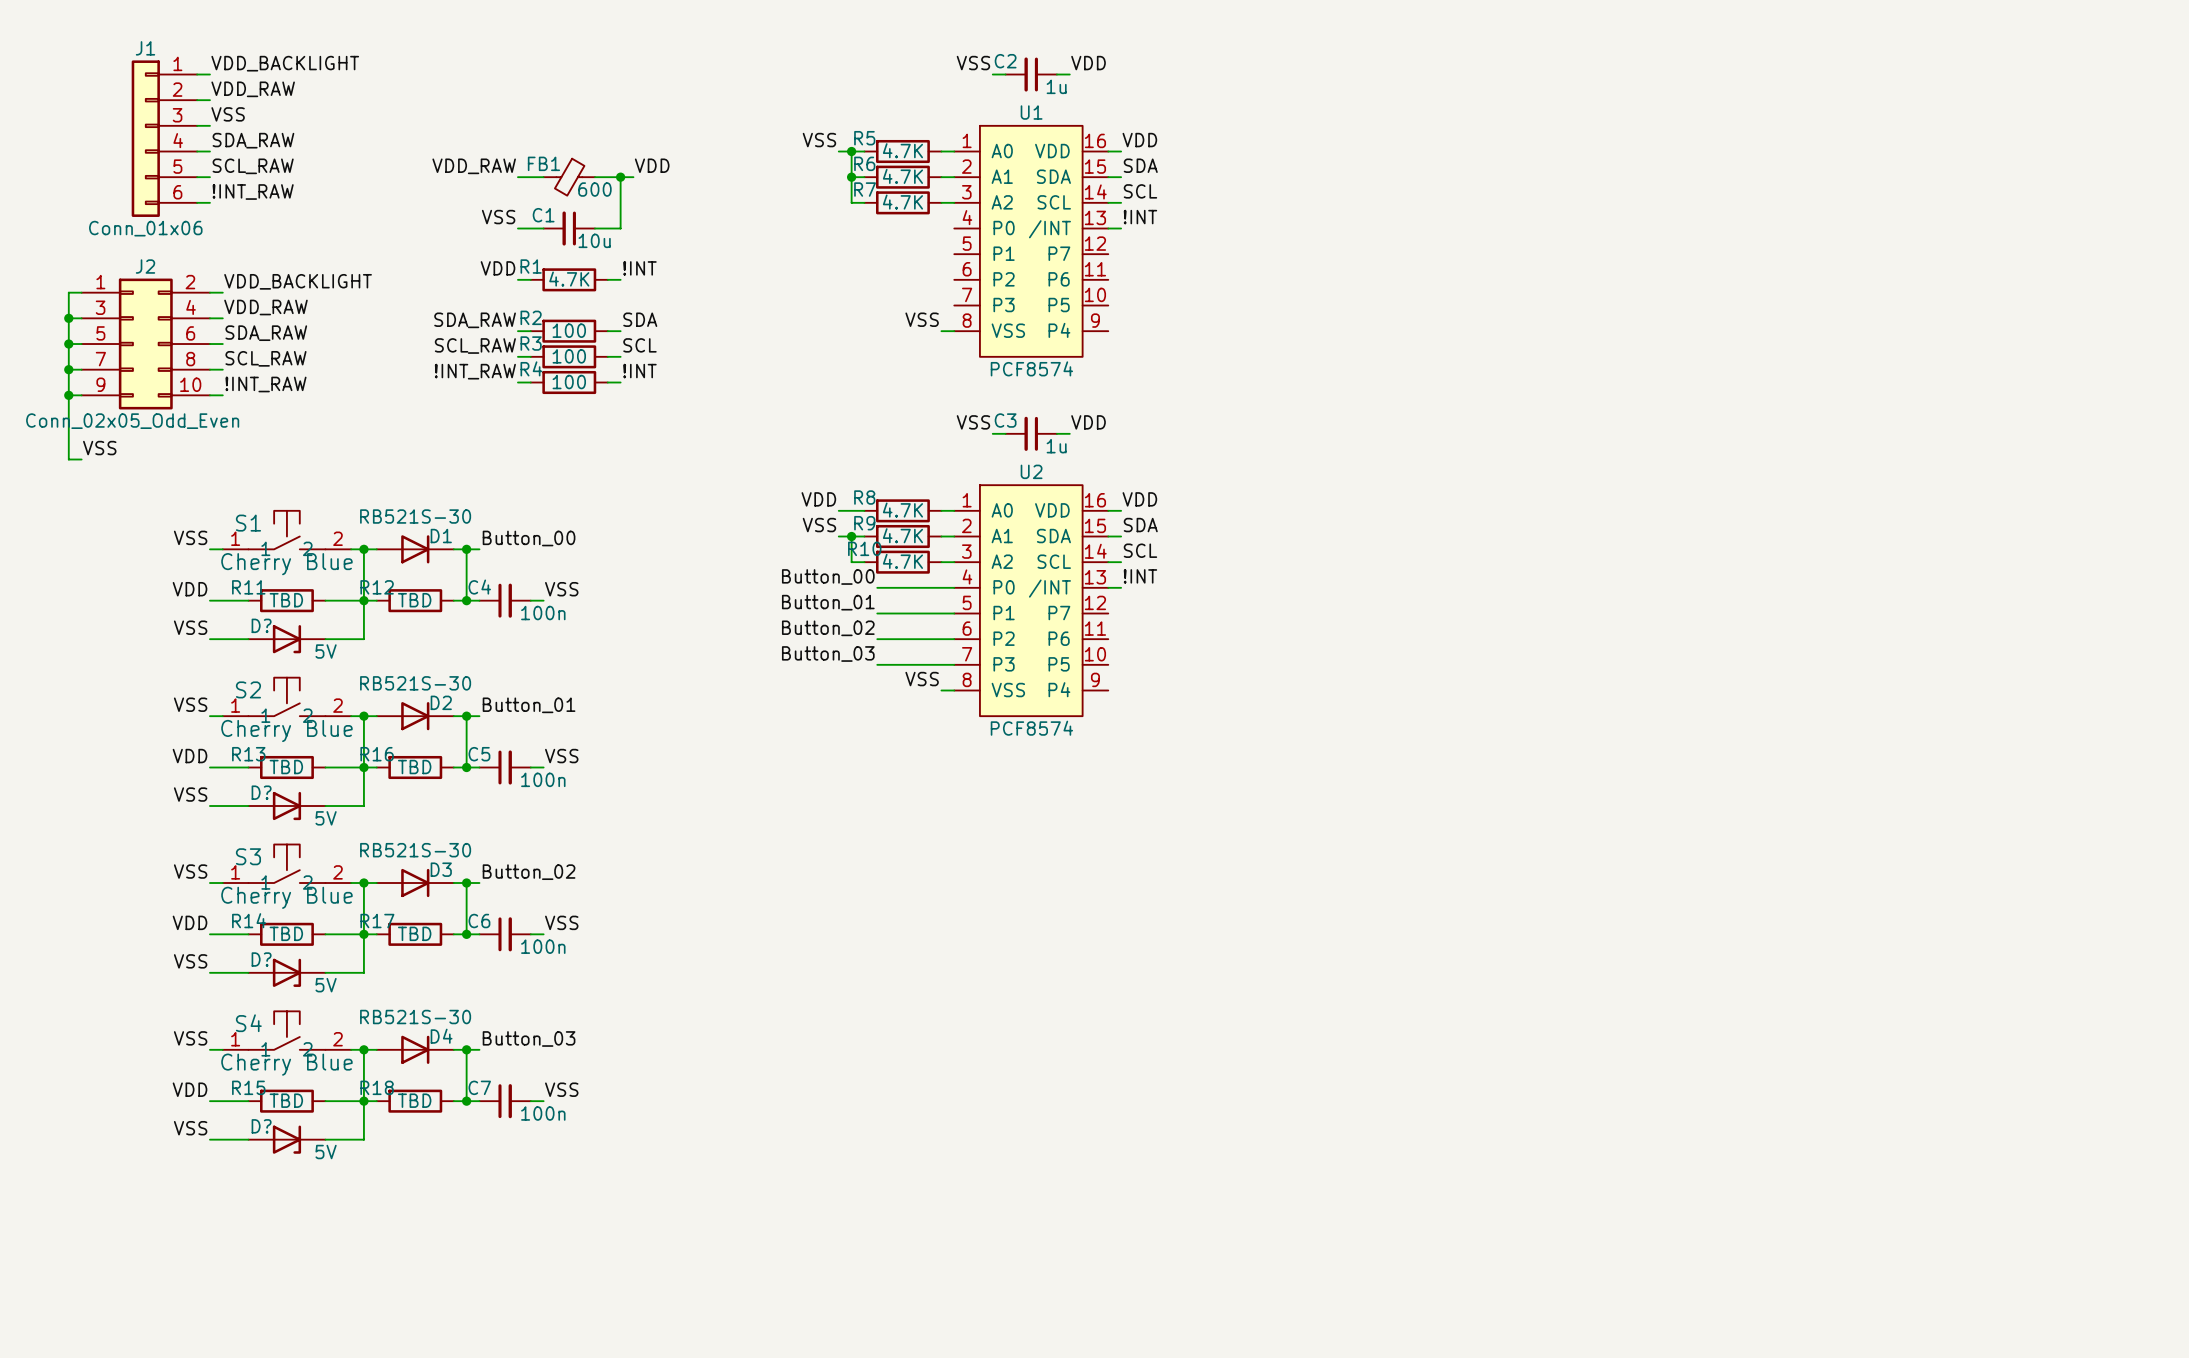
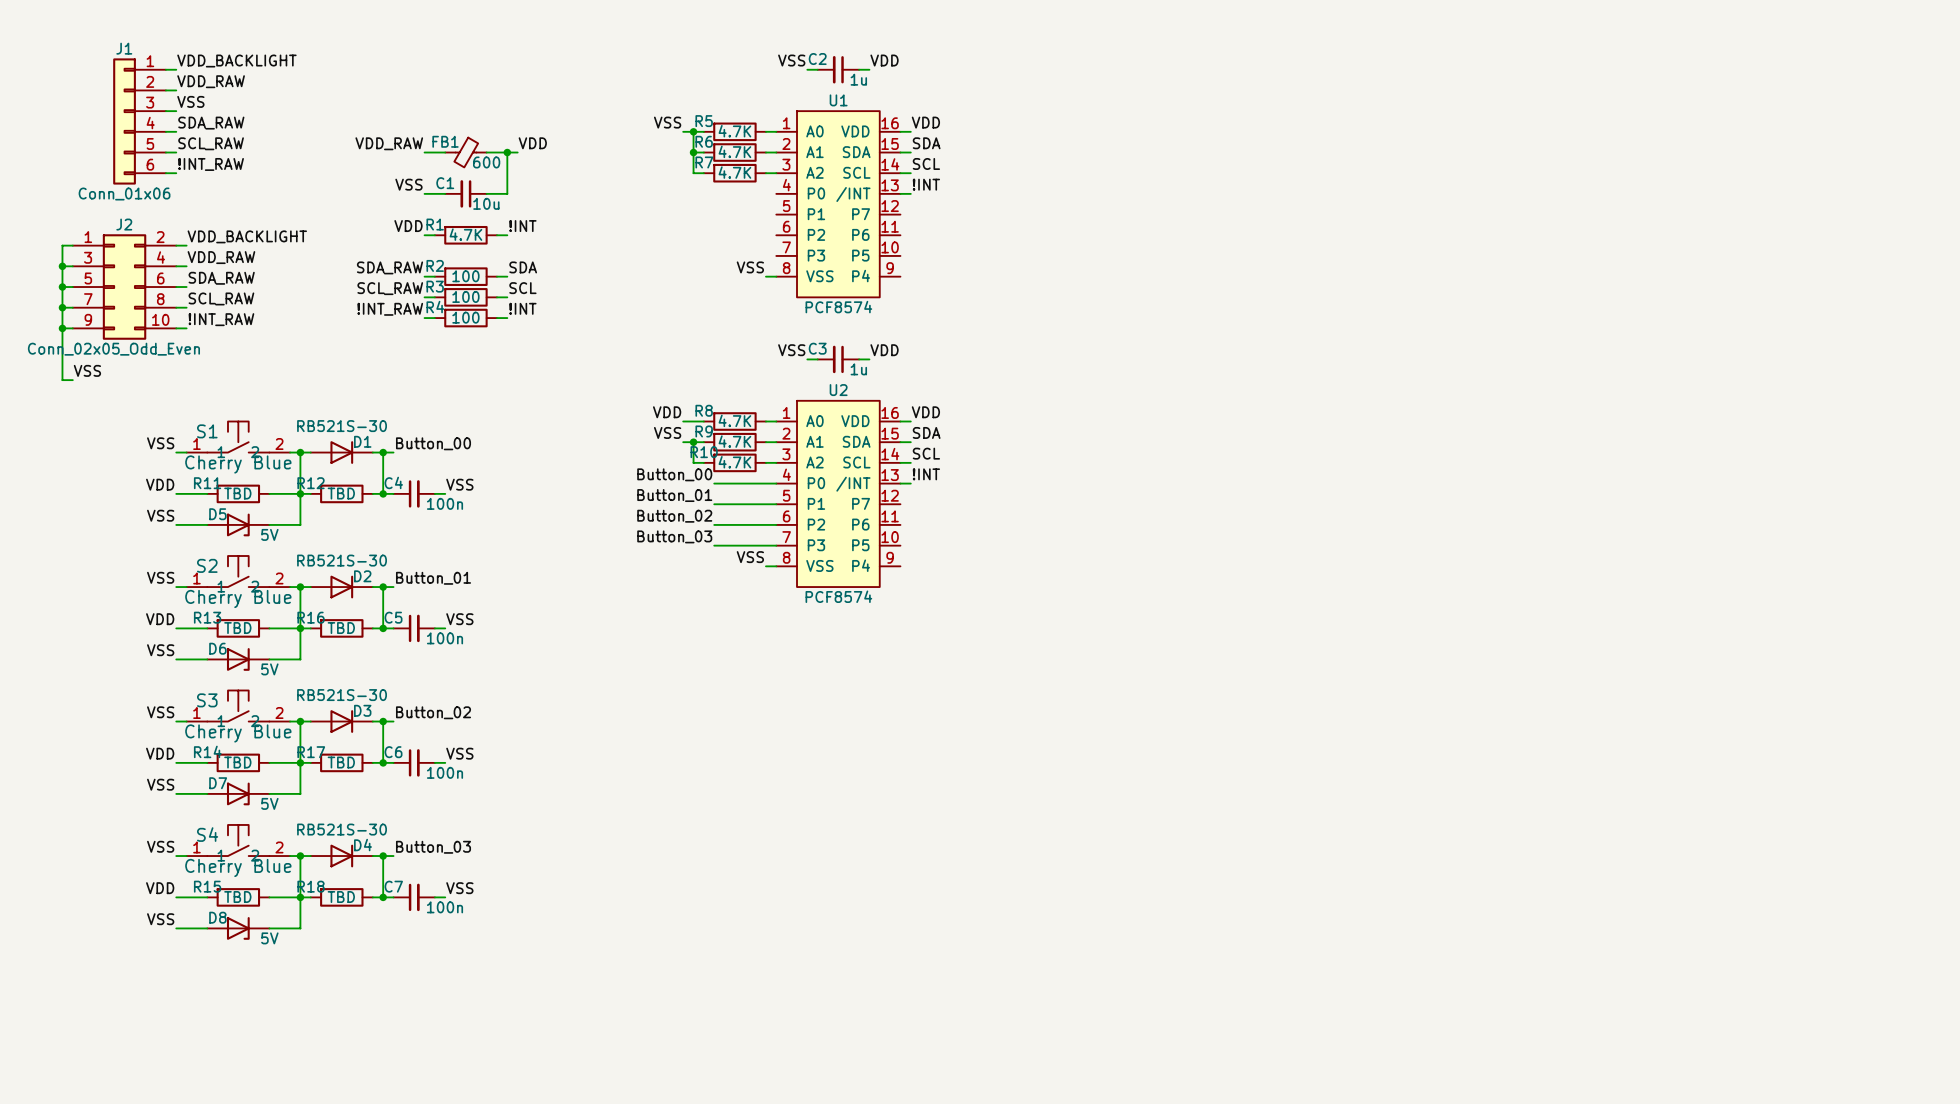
D? name: D? (261, 625) -> D5 (217, 514)
D? name: D? (261, 792) -> D6 (217, 648)
D? name: D? (261, 959) -> D7 (218, 783)
D? name: D? (261, 1126) -> D8 (217, 917)

